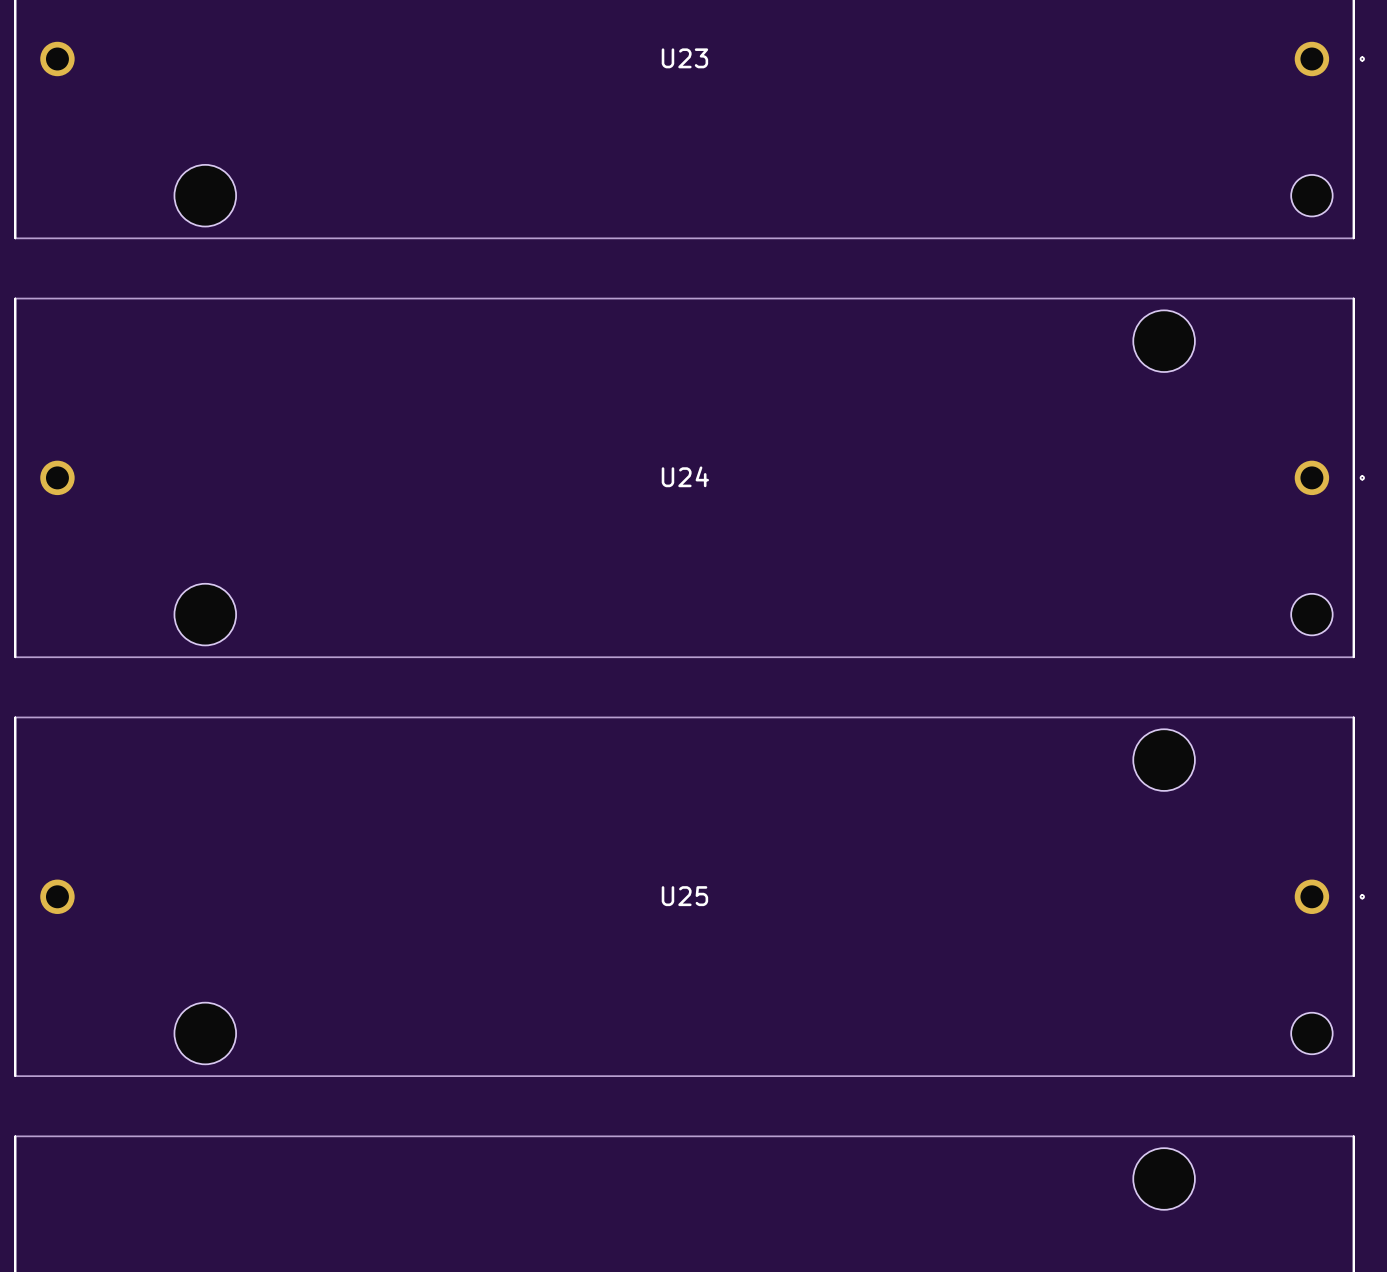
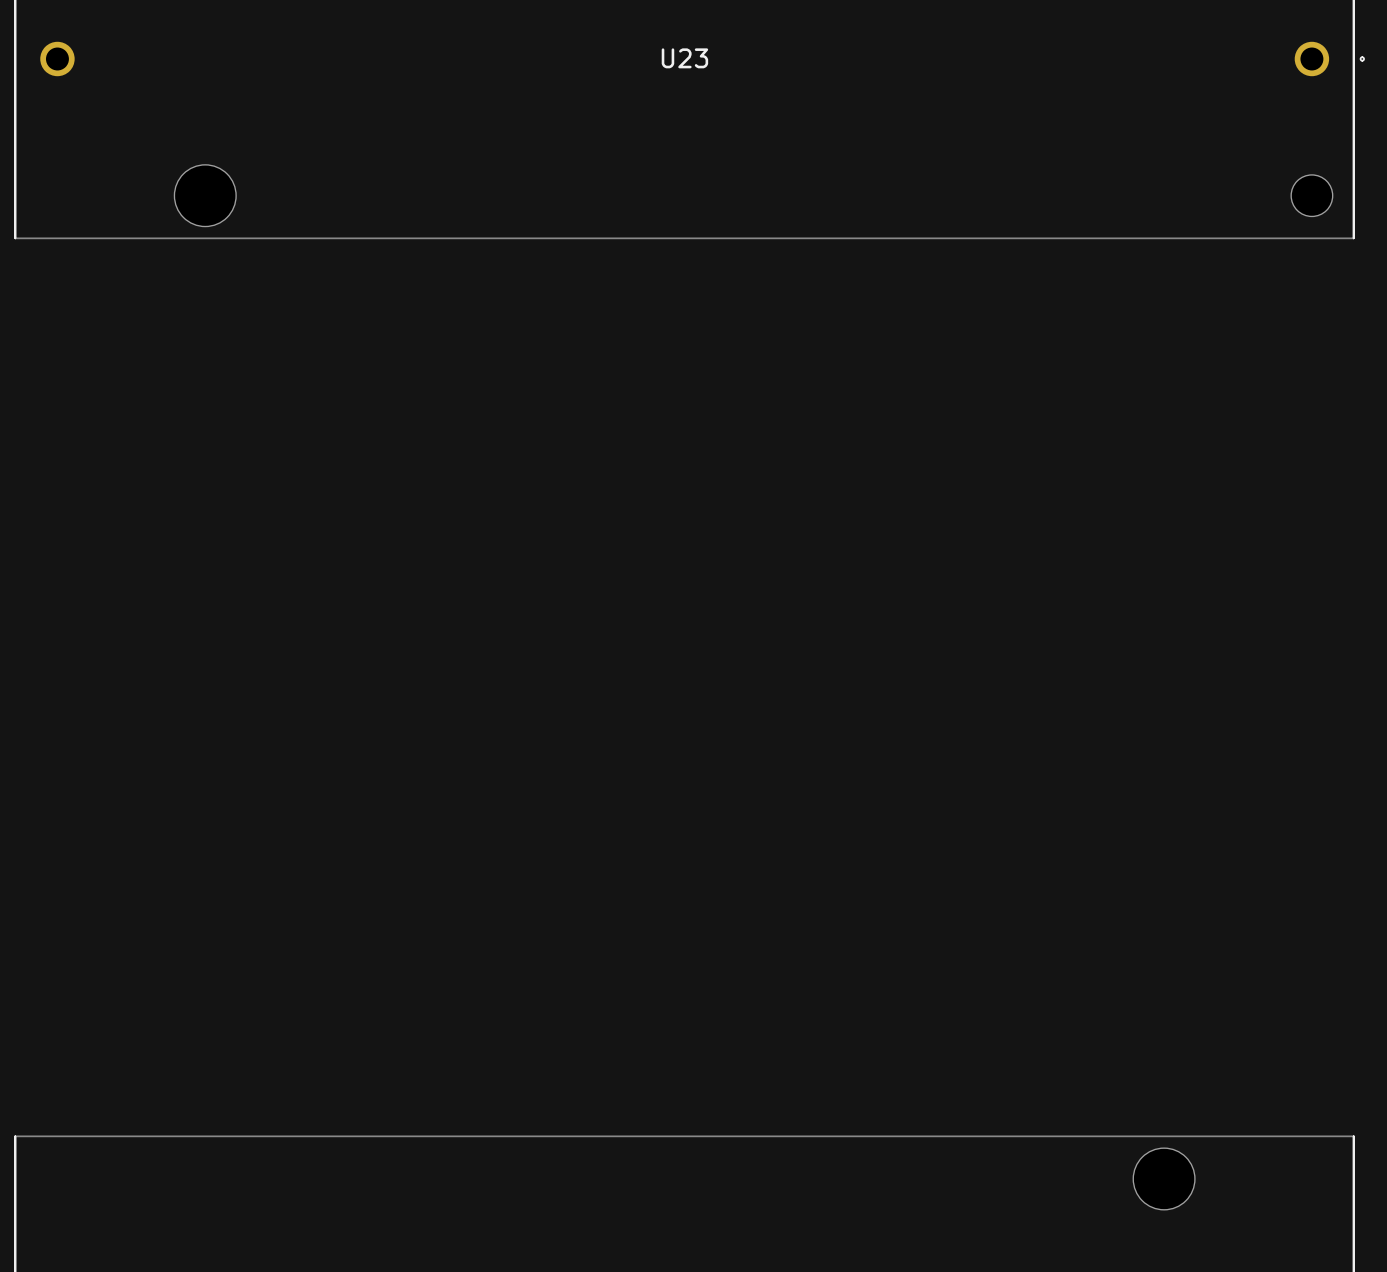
U24: (689, 477) -> none
U25: (689, 896) -> none

